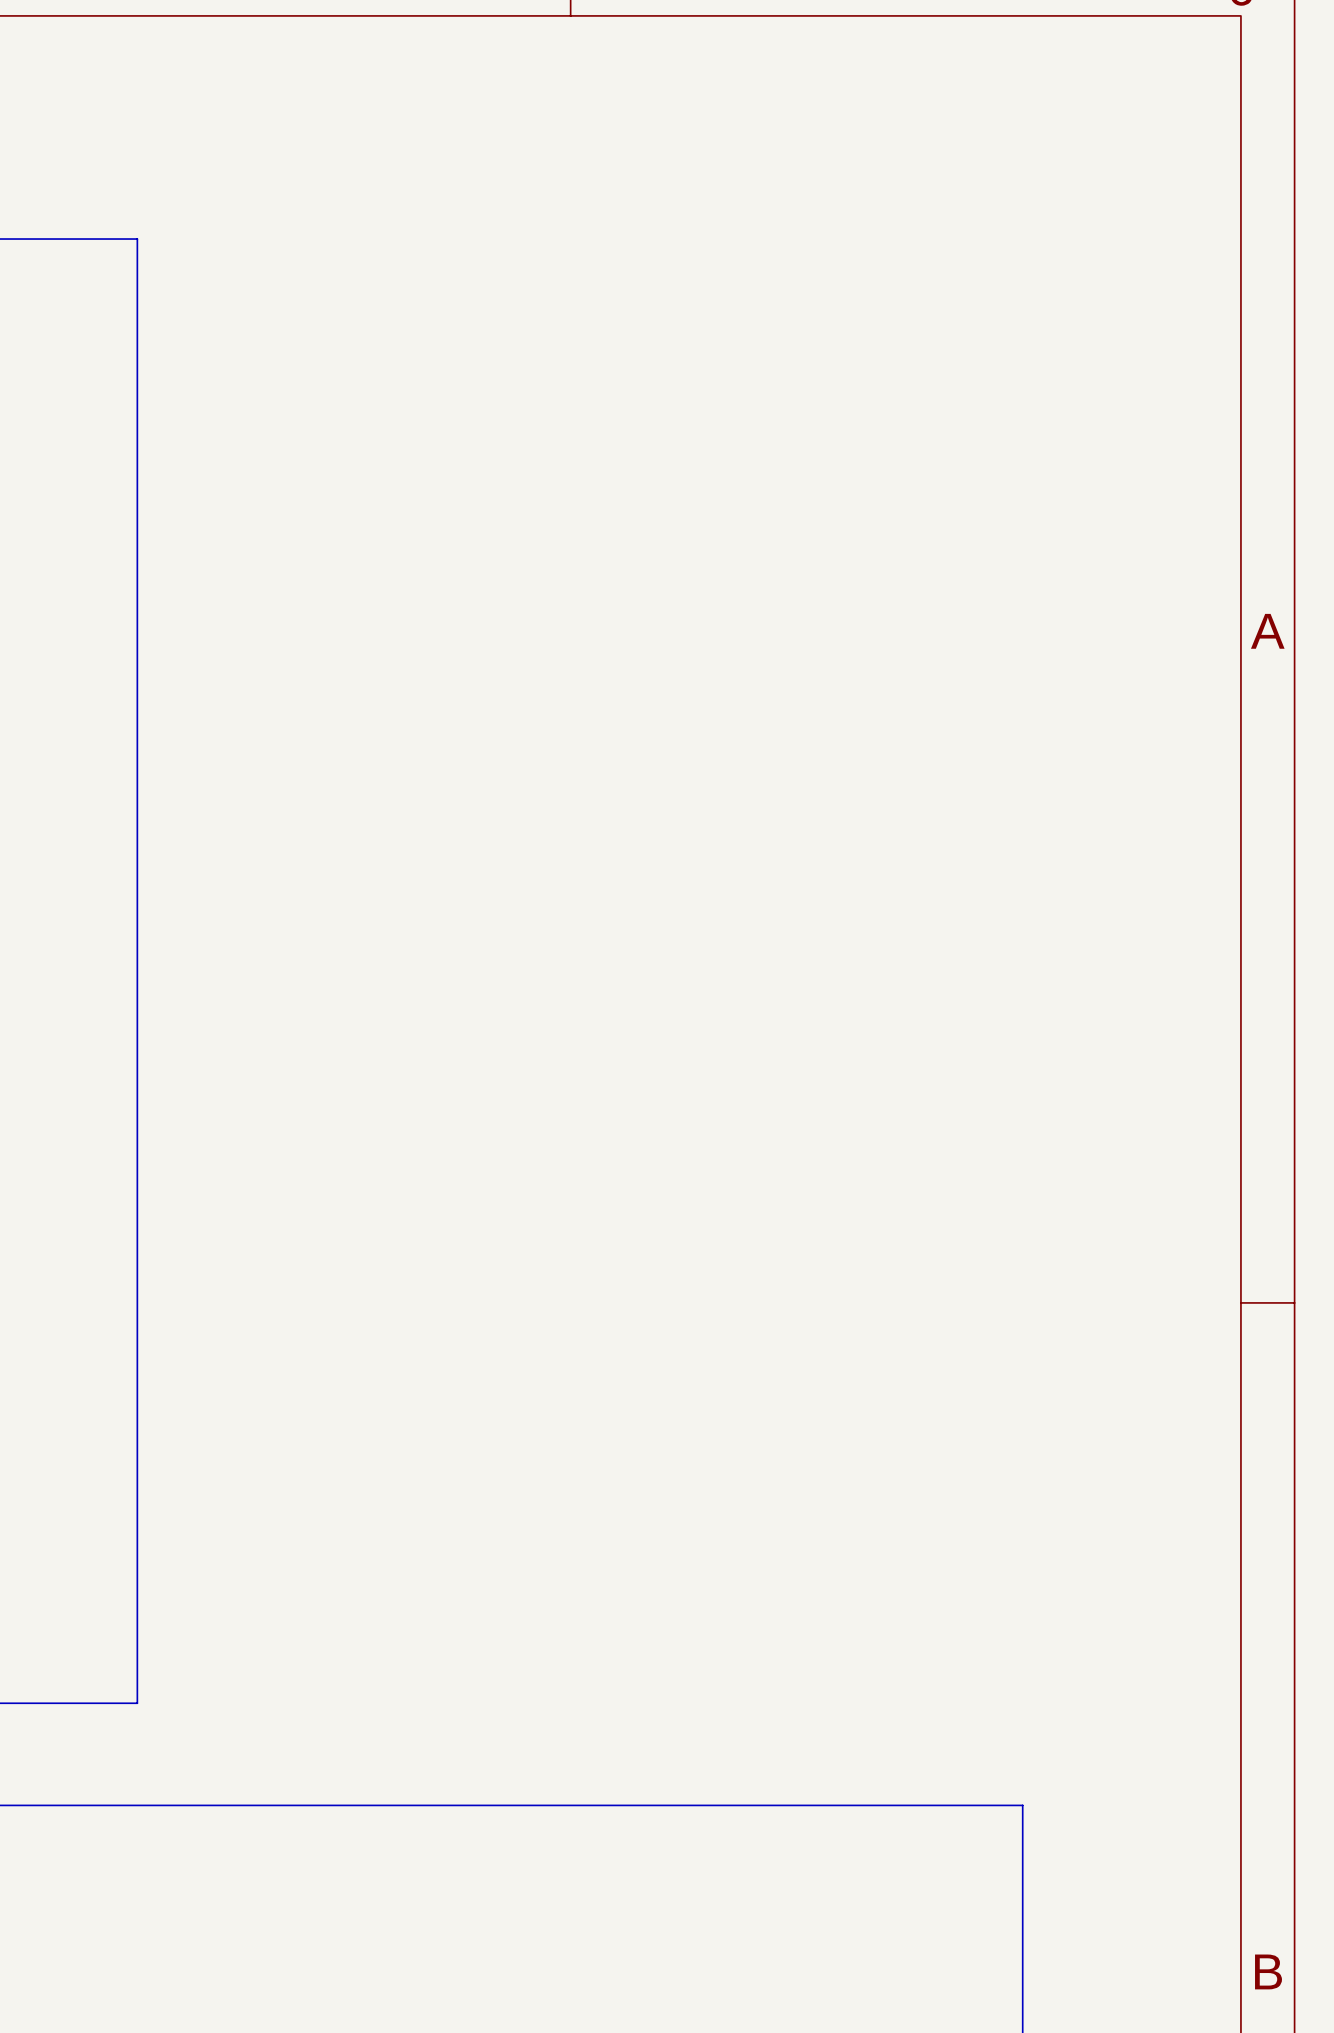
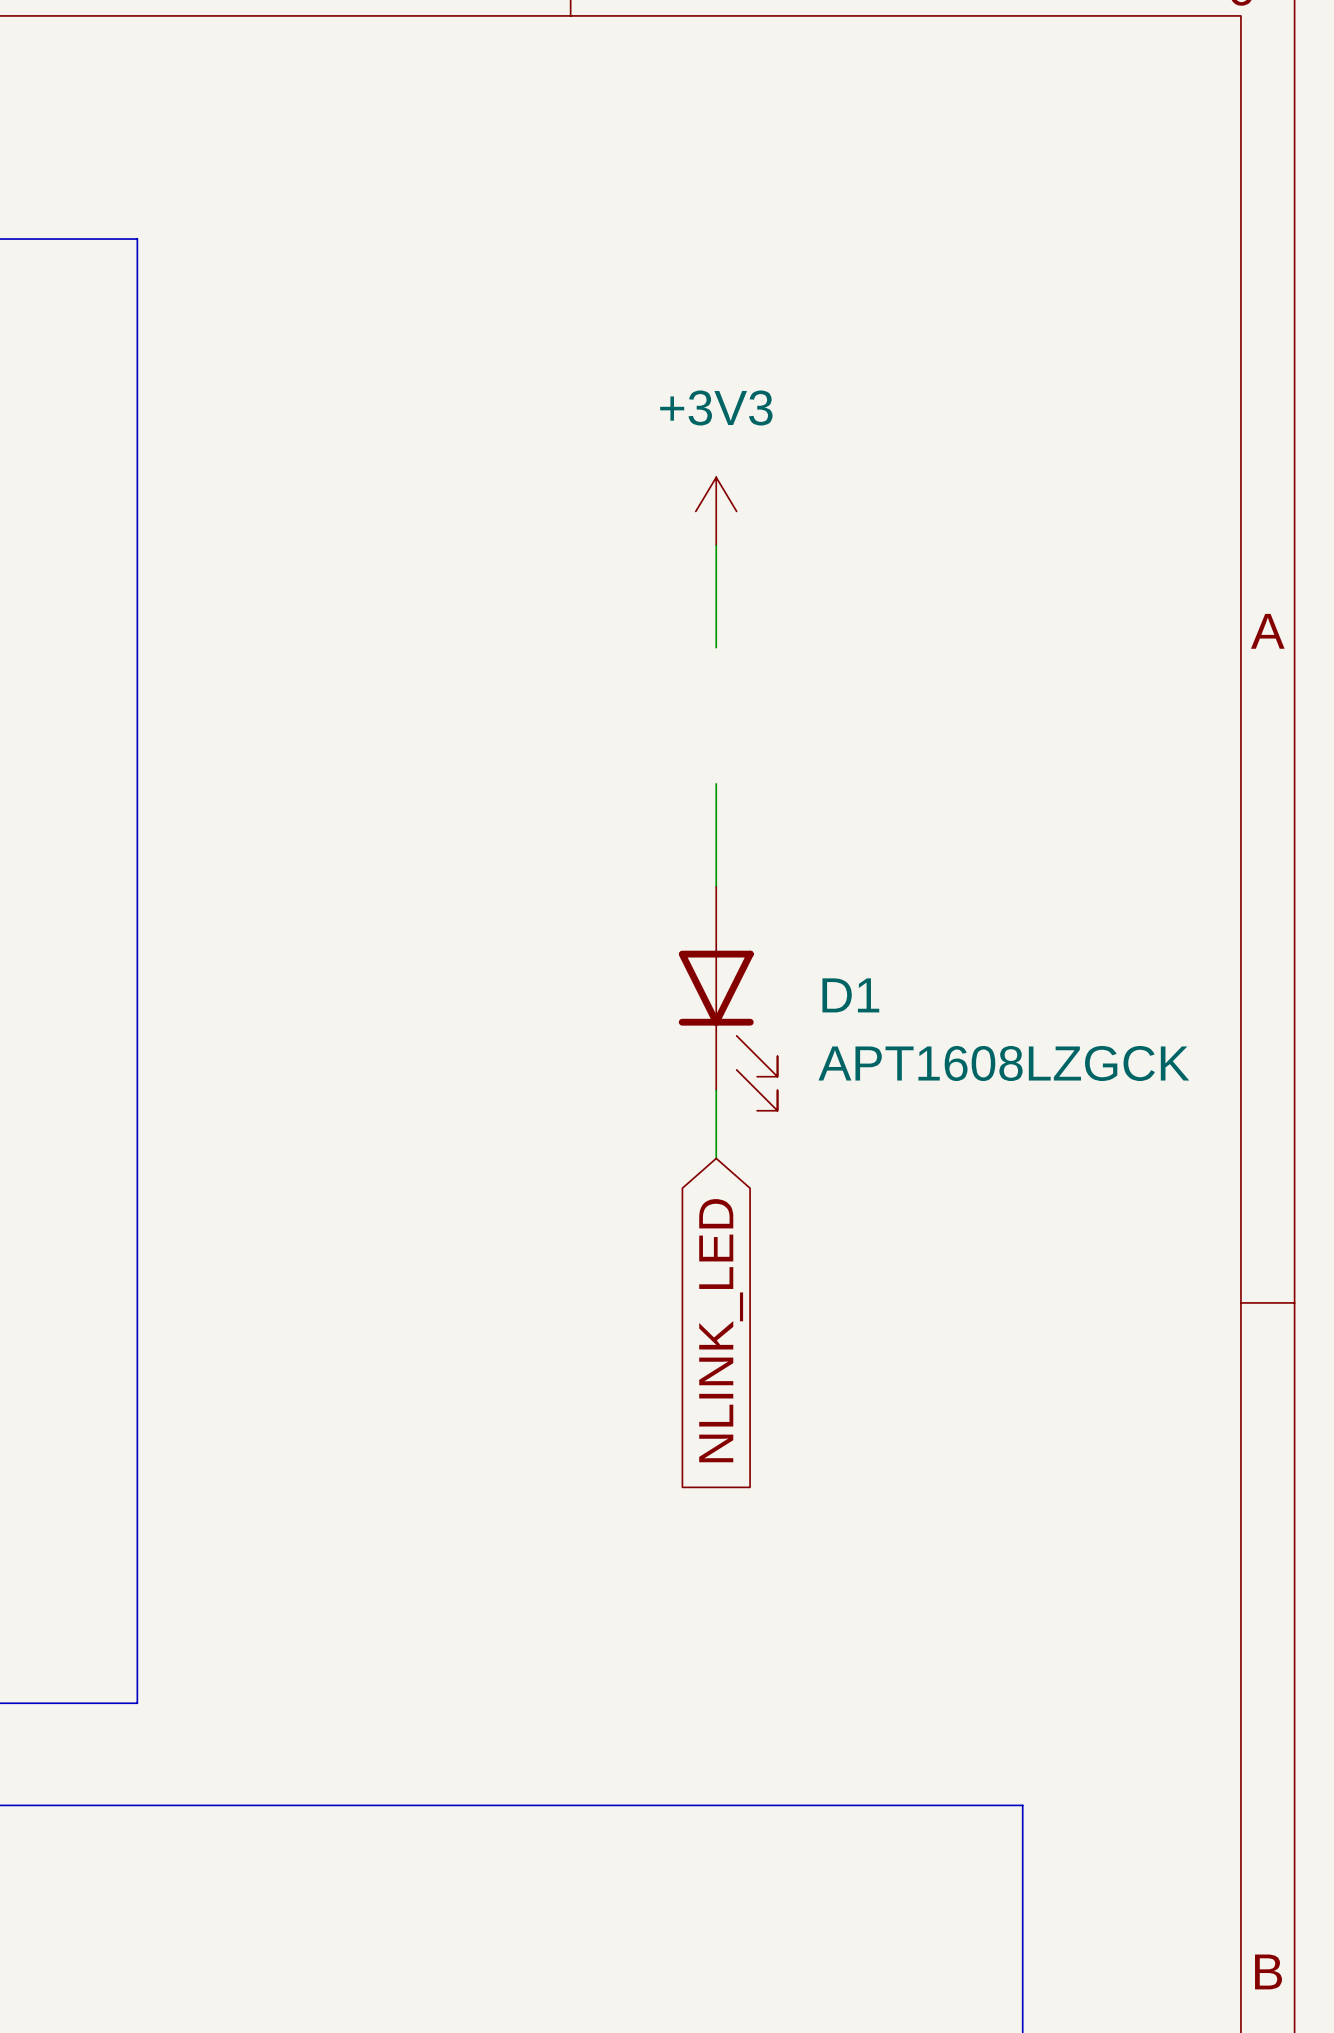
power symbol: none -> +3V3 (716, 511)
wire: none -> (716, 545) (716, 647)
wire: none -> (716, 783) (716, 886)
D1: none -> APT1608LZGCK (728, 998)
wire: none -> (716, 1090) (716, 1158)
global label: none -> NLINK_LED (721, 1330)

